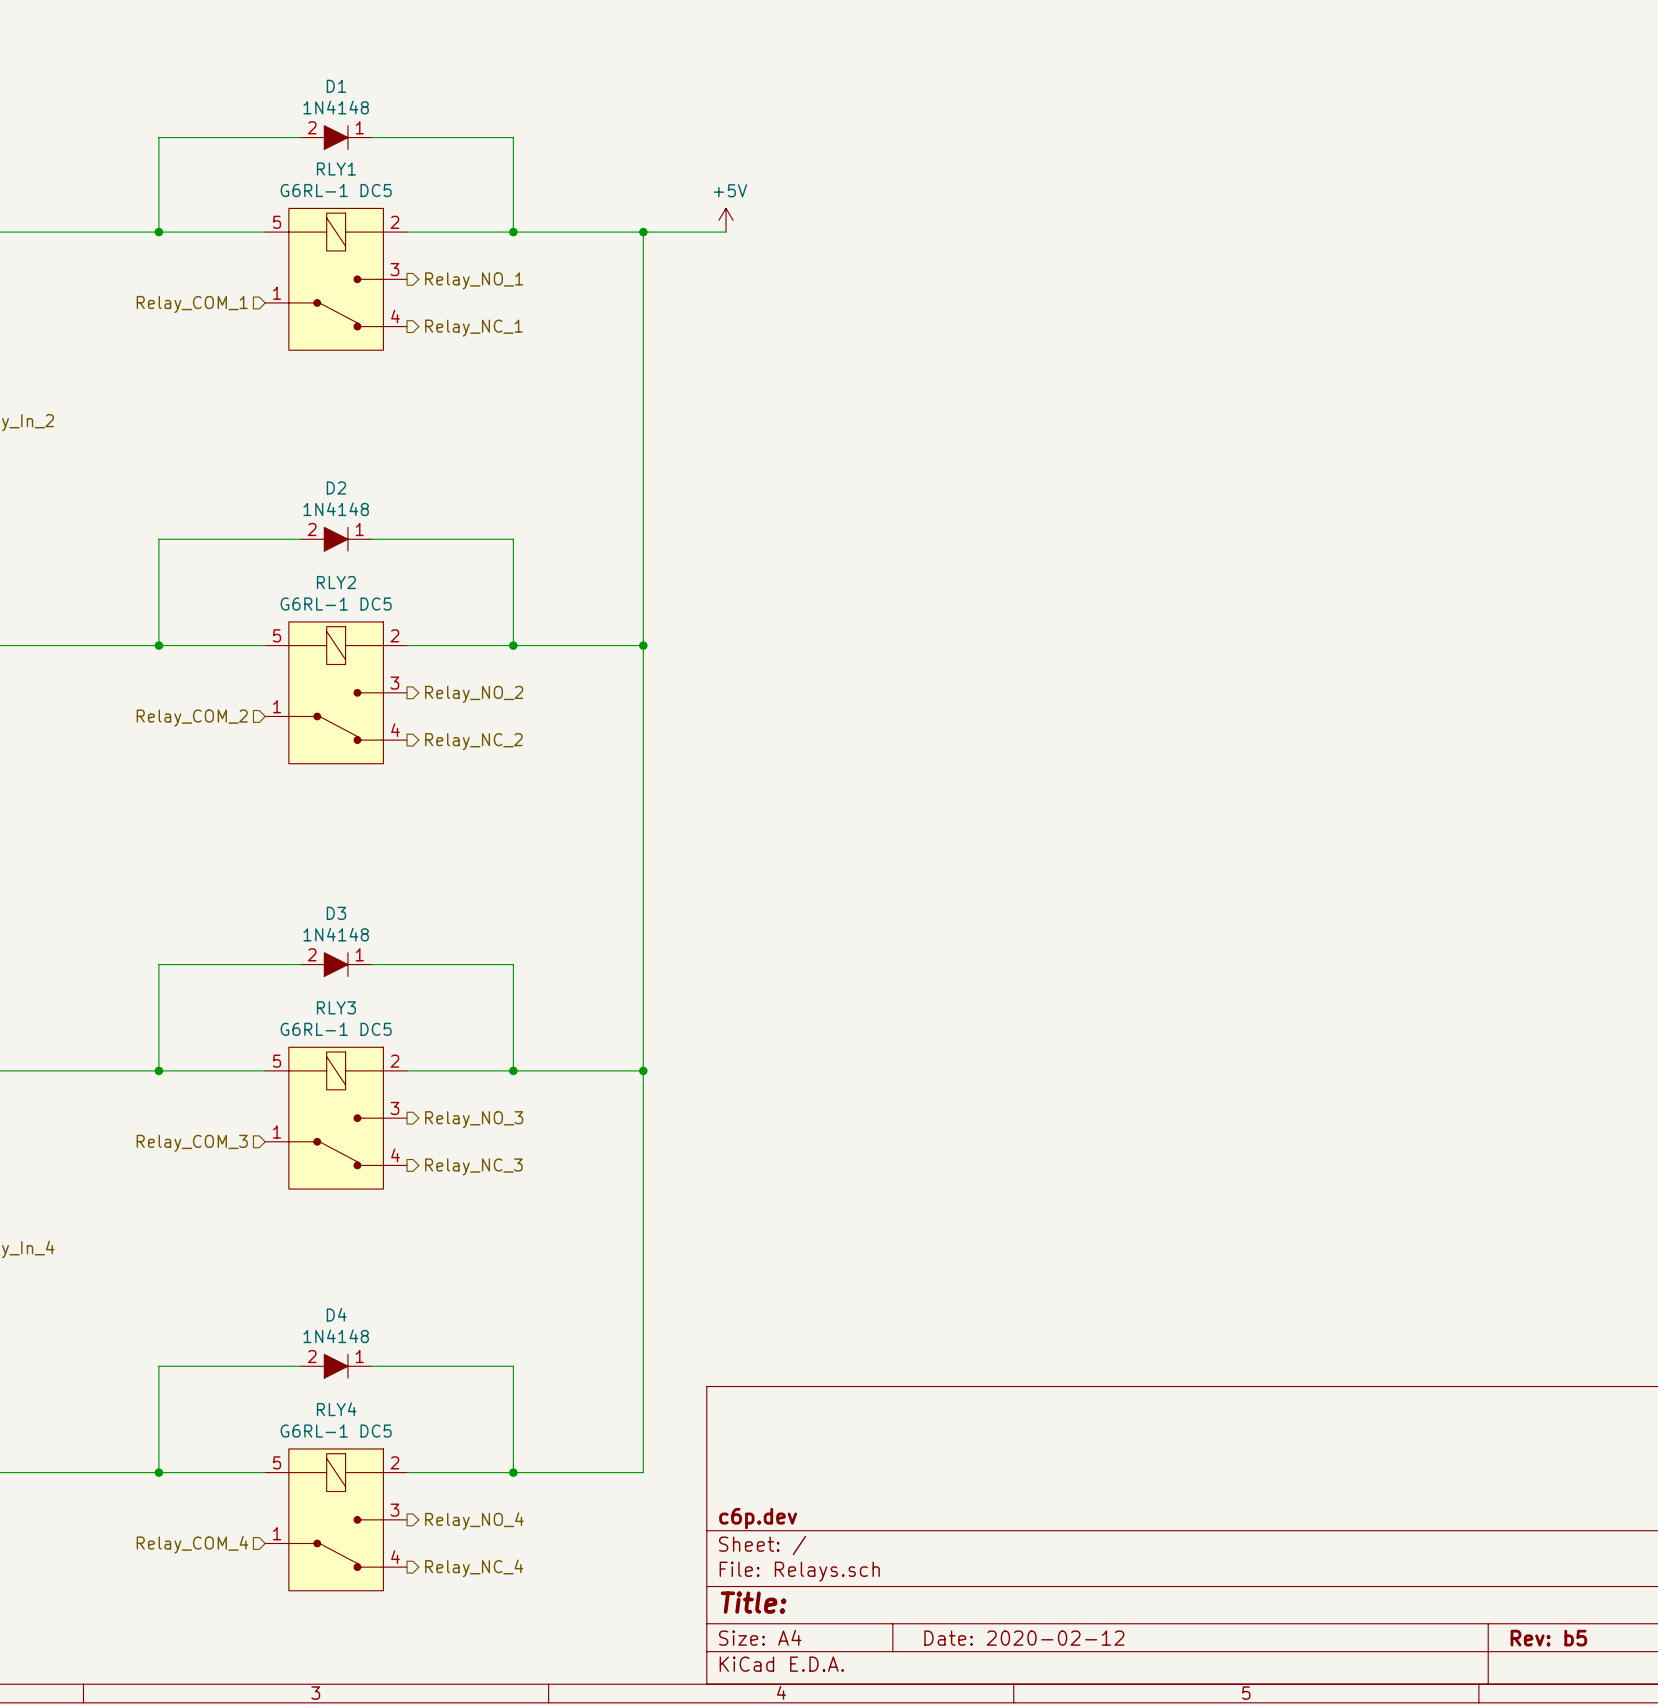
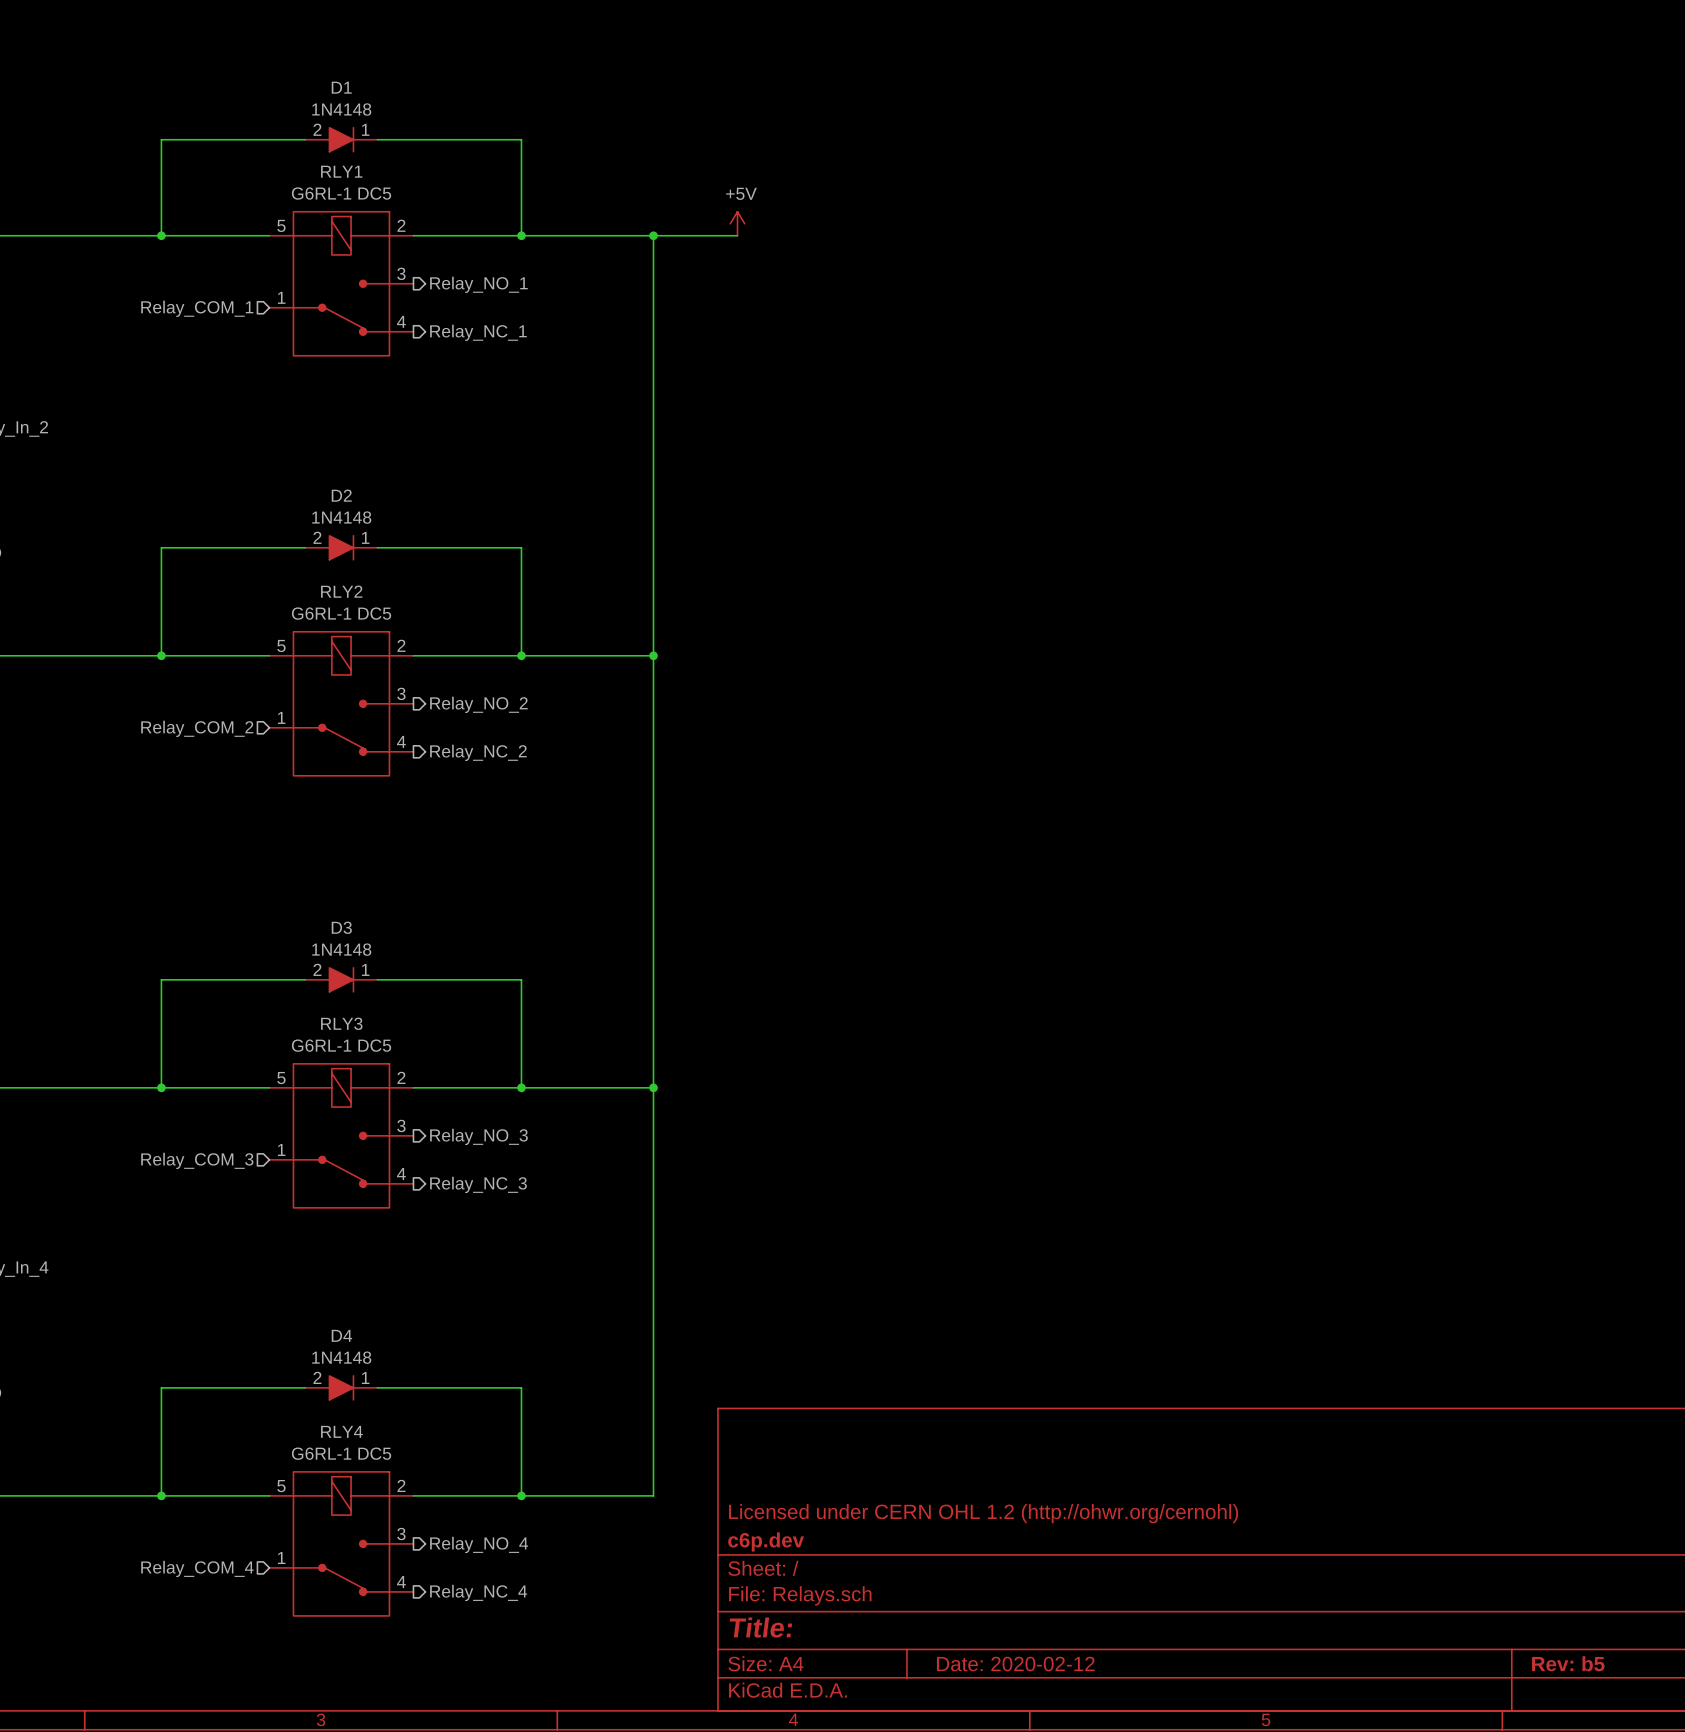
title block: none -> Licensed under CERN OHL 1.2 (http://ohwr.org/cernohl) (983, 1513)

